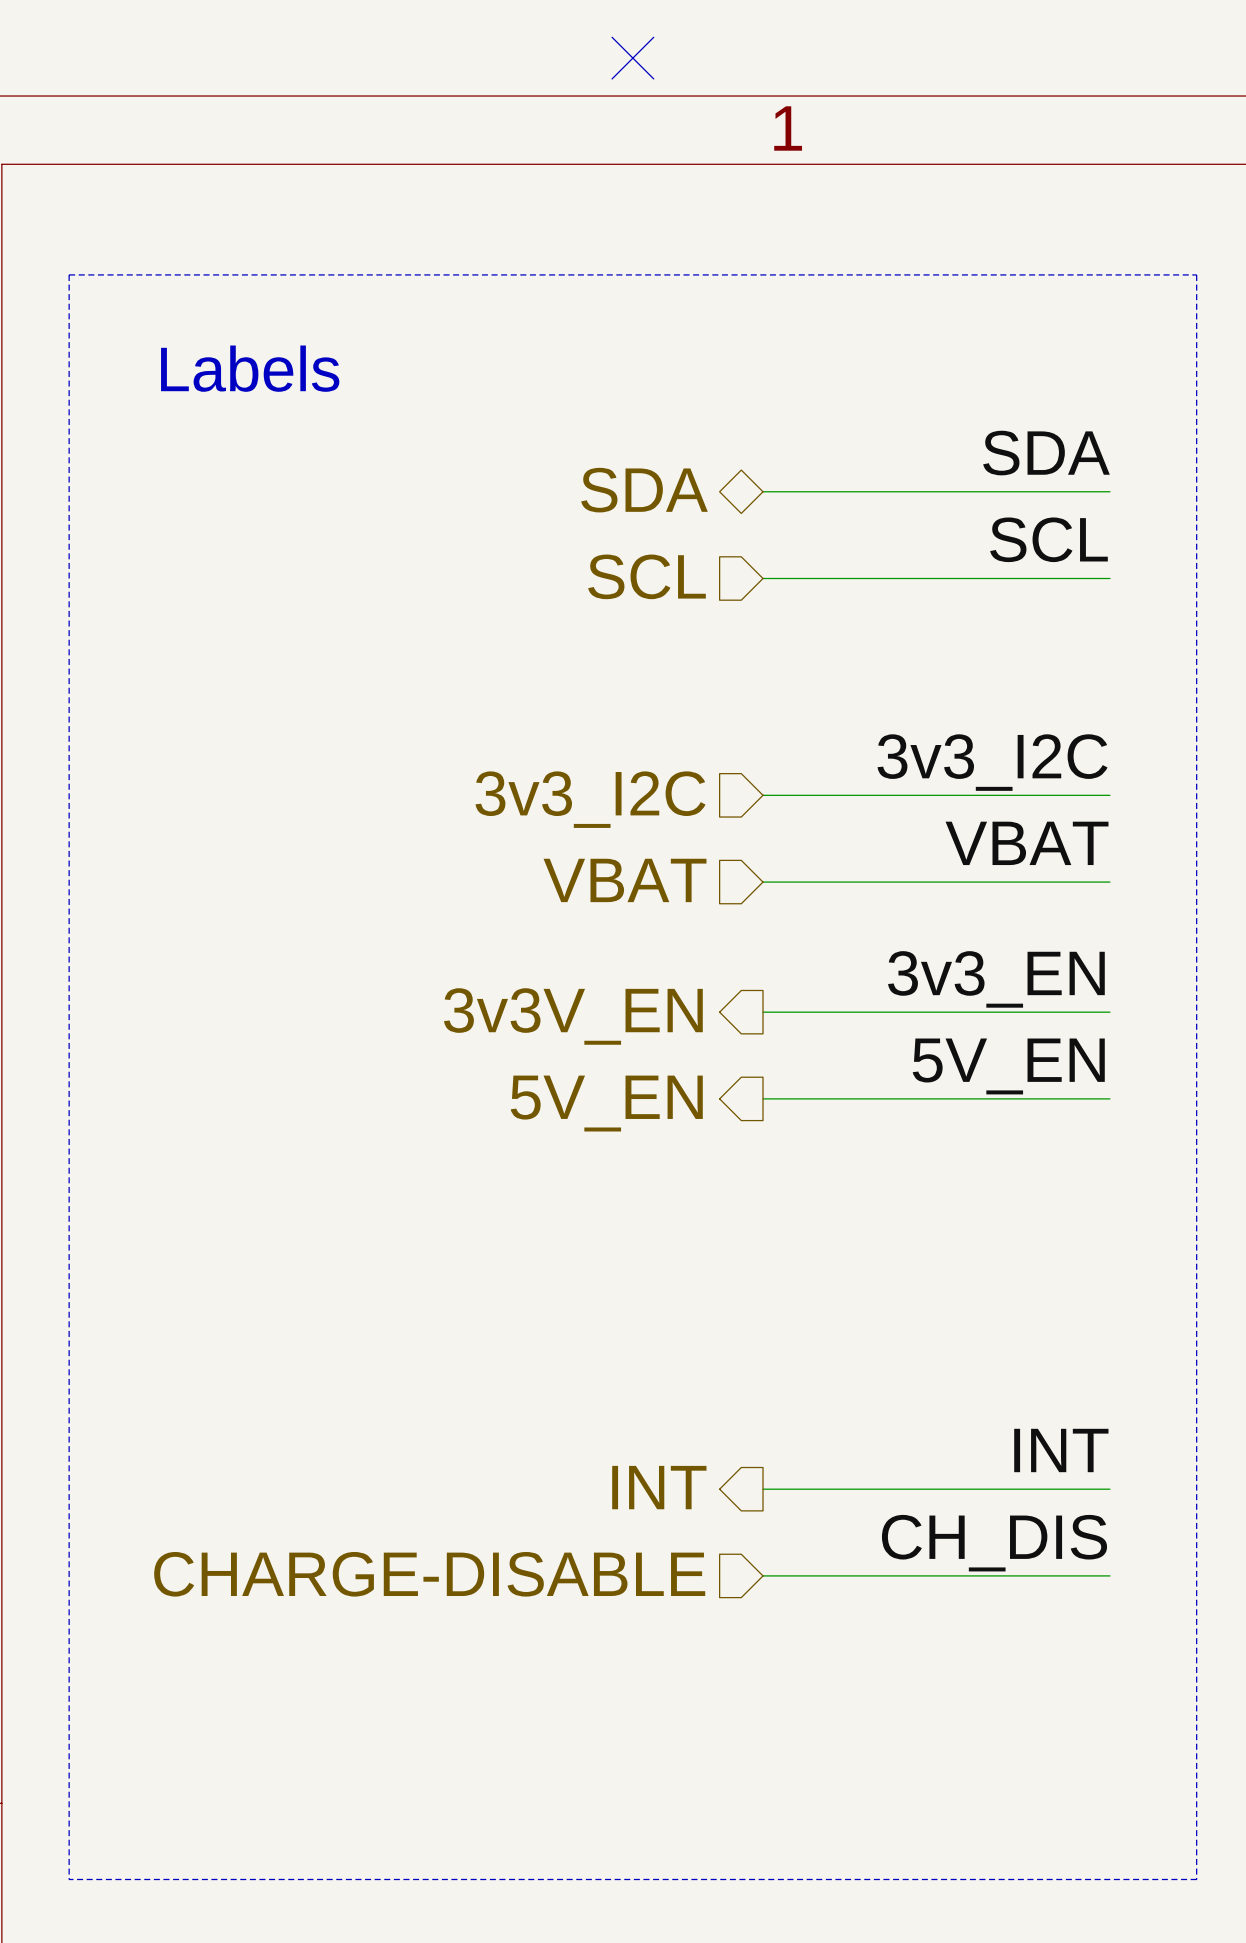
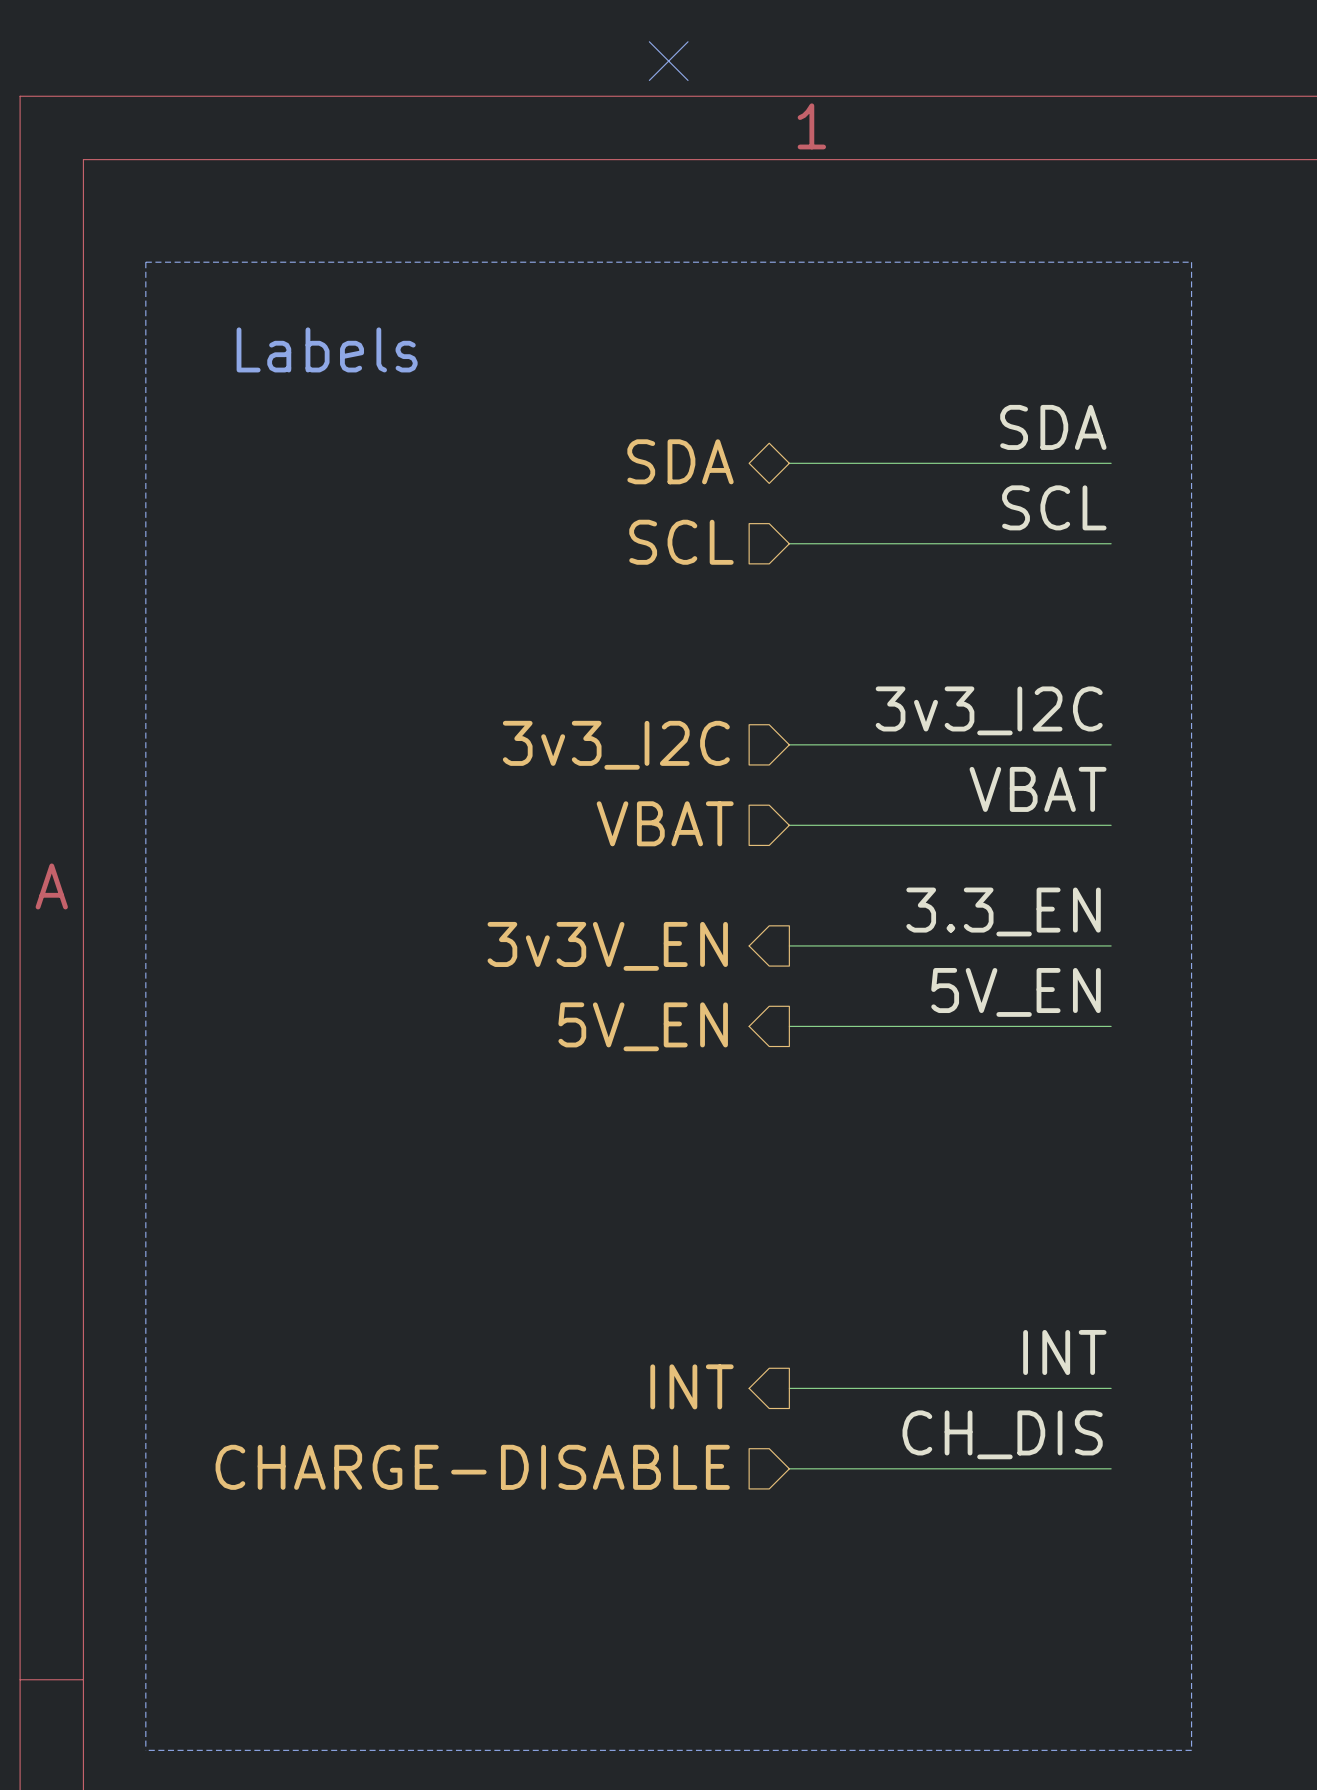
label: 3v3_EN (996, 979) -> 3.3_EN (1003, 911)

